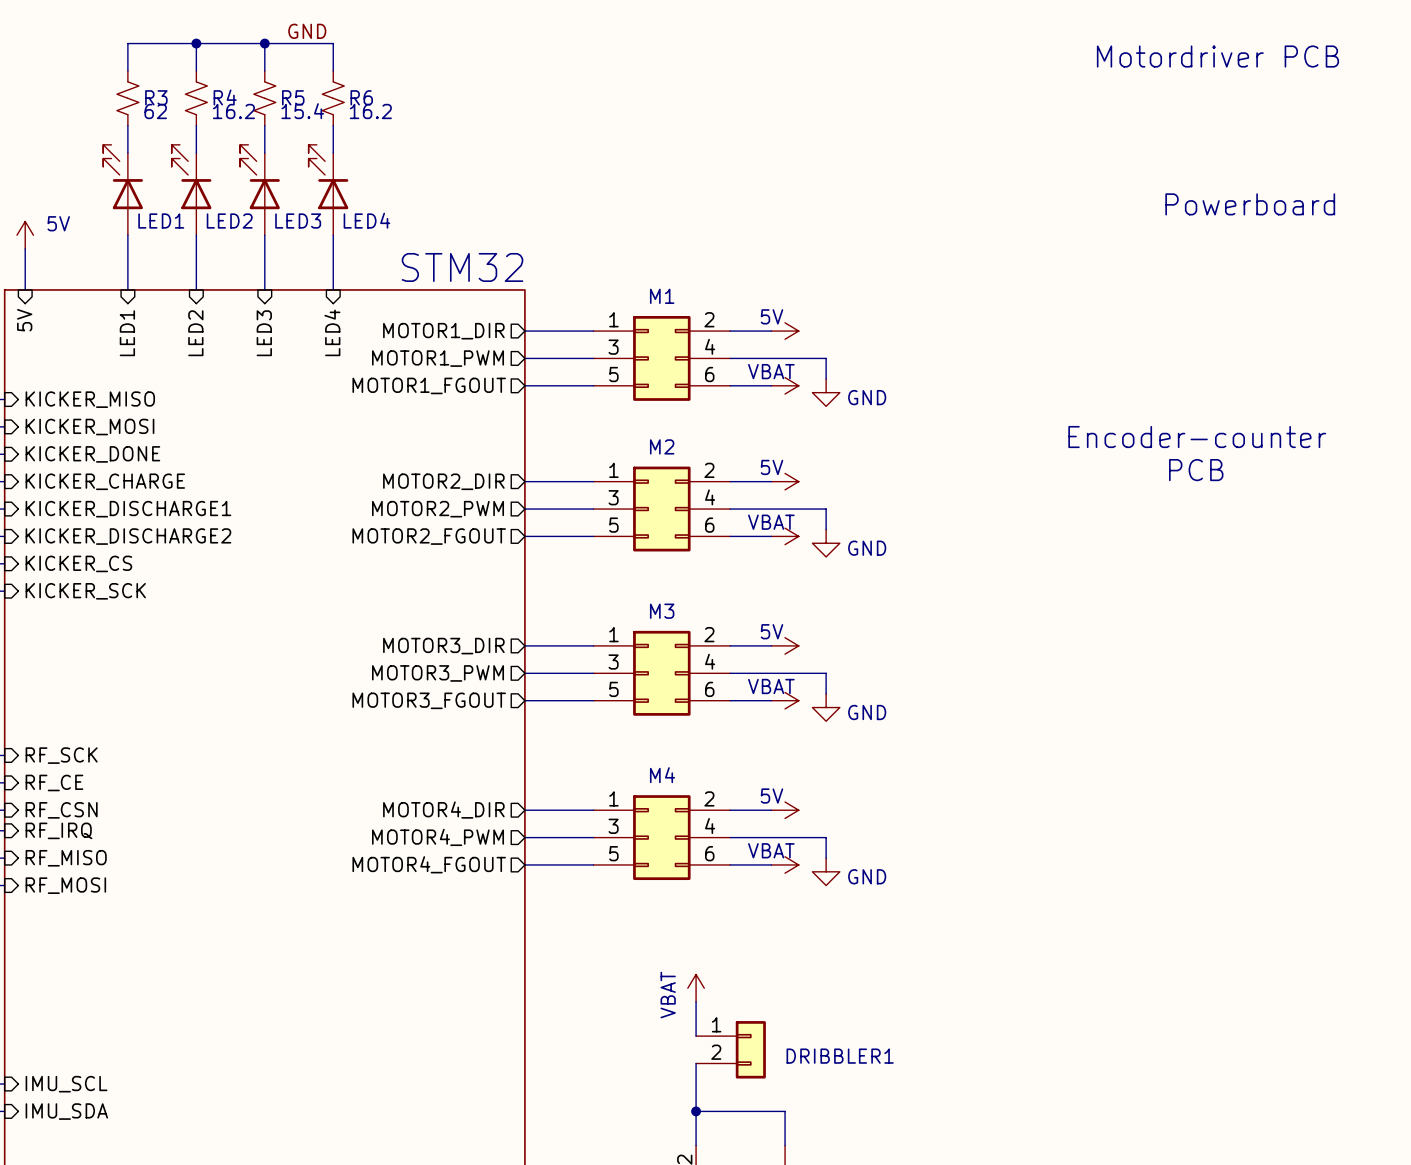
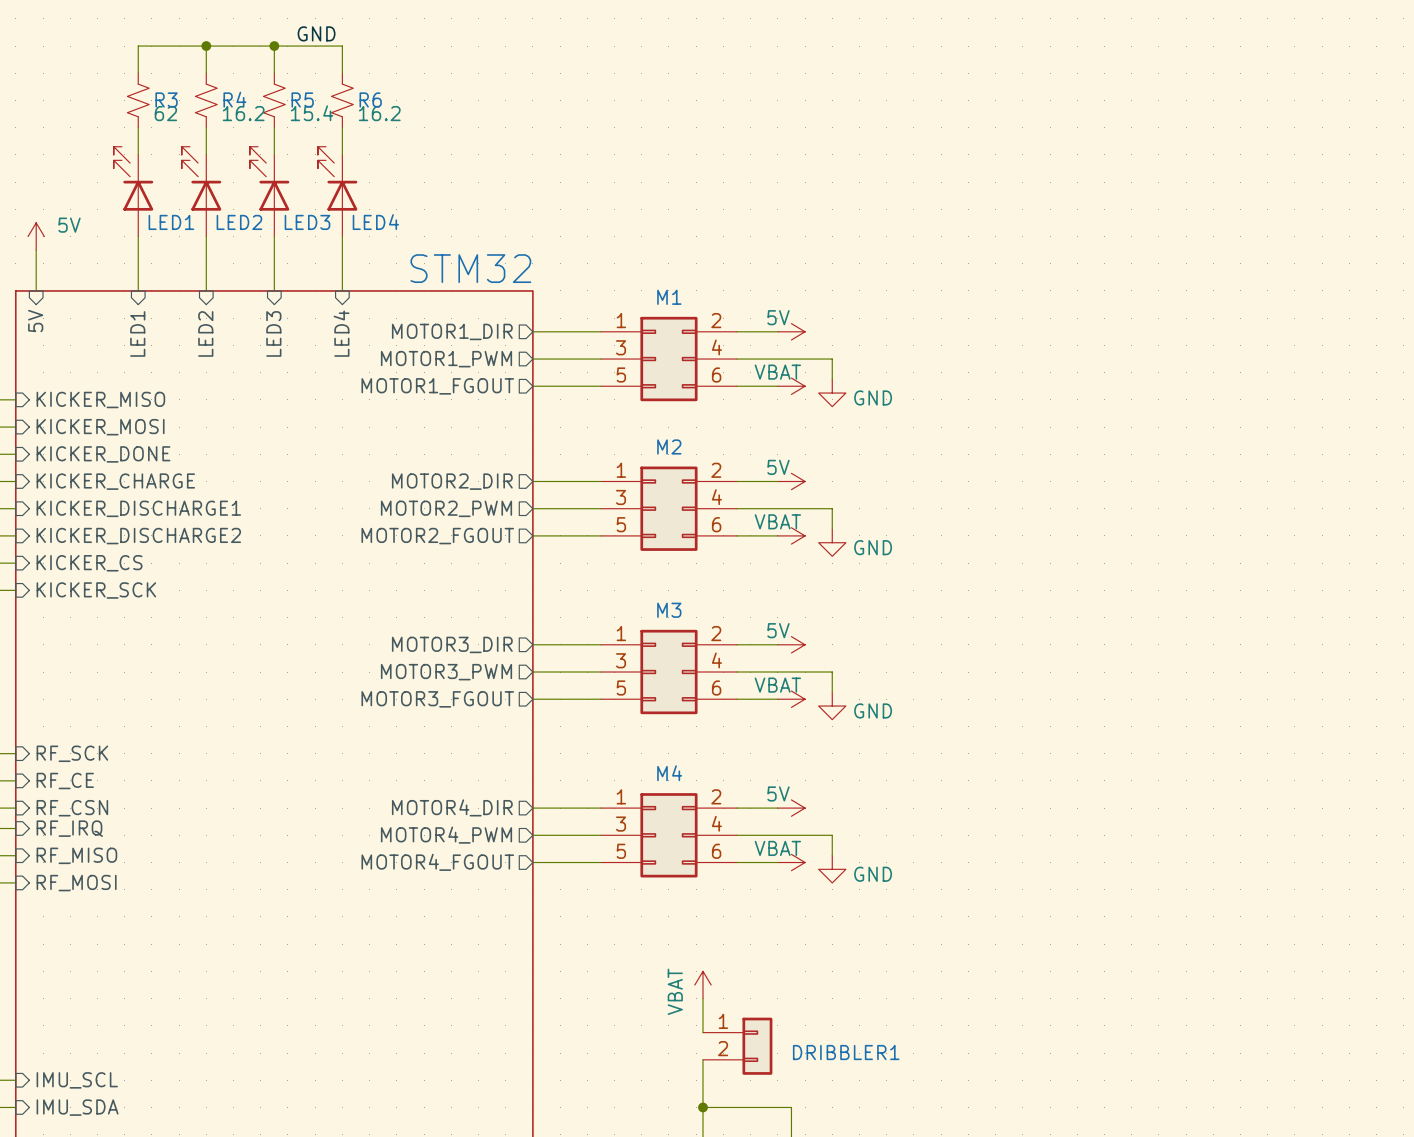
text: Motordriver PCB (1217, 56) -> none
text: Powerboard (1250, 204) -> none
text: Encoder-counter (1197, 437) -> none
text: PCB (1196, 470) -> none

